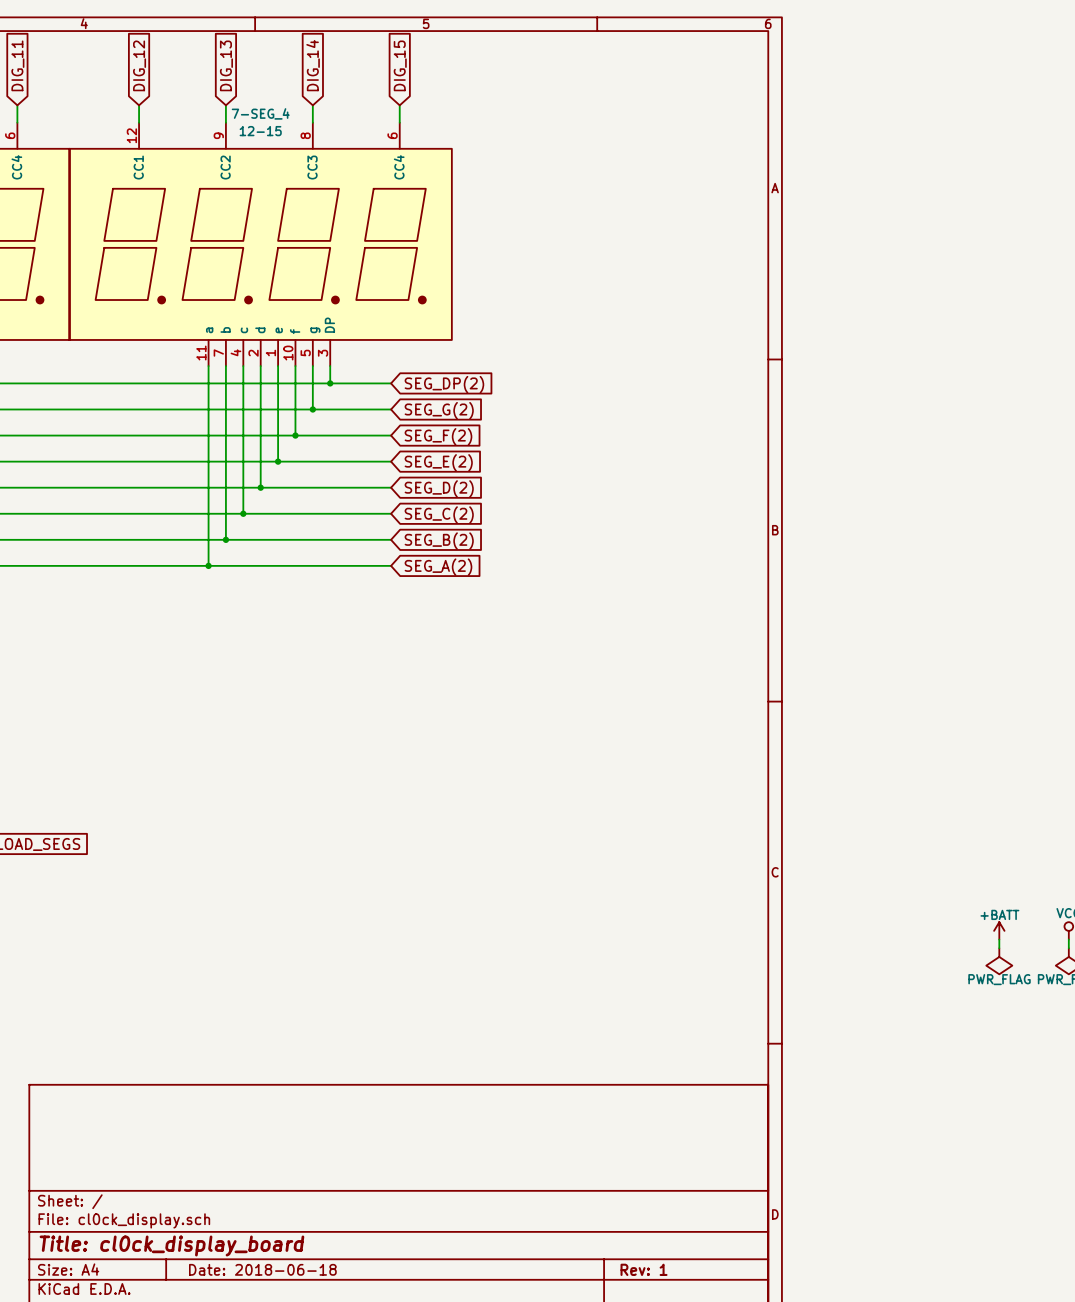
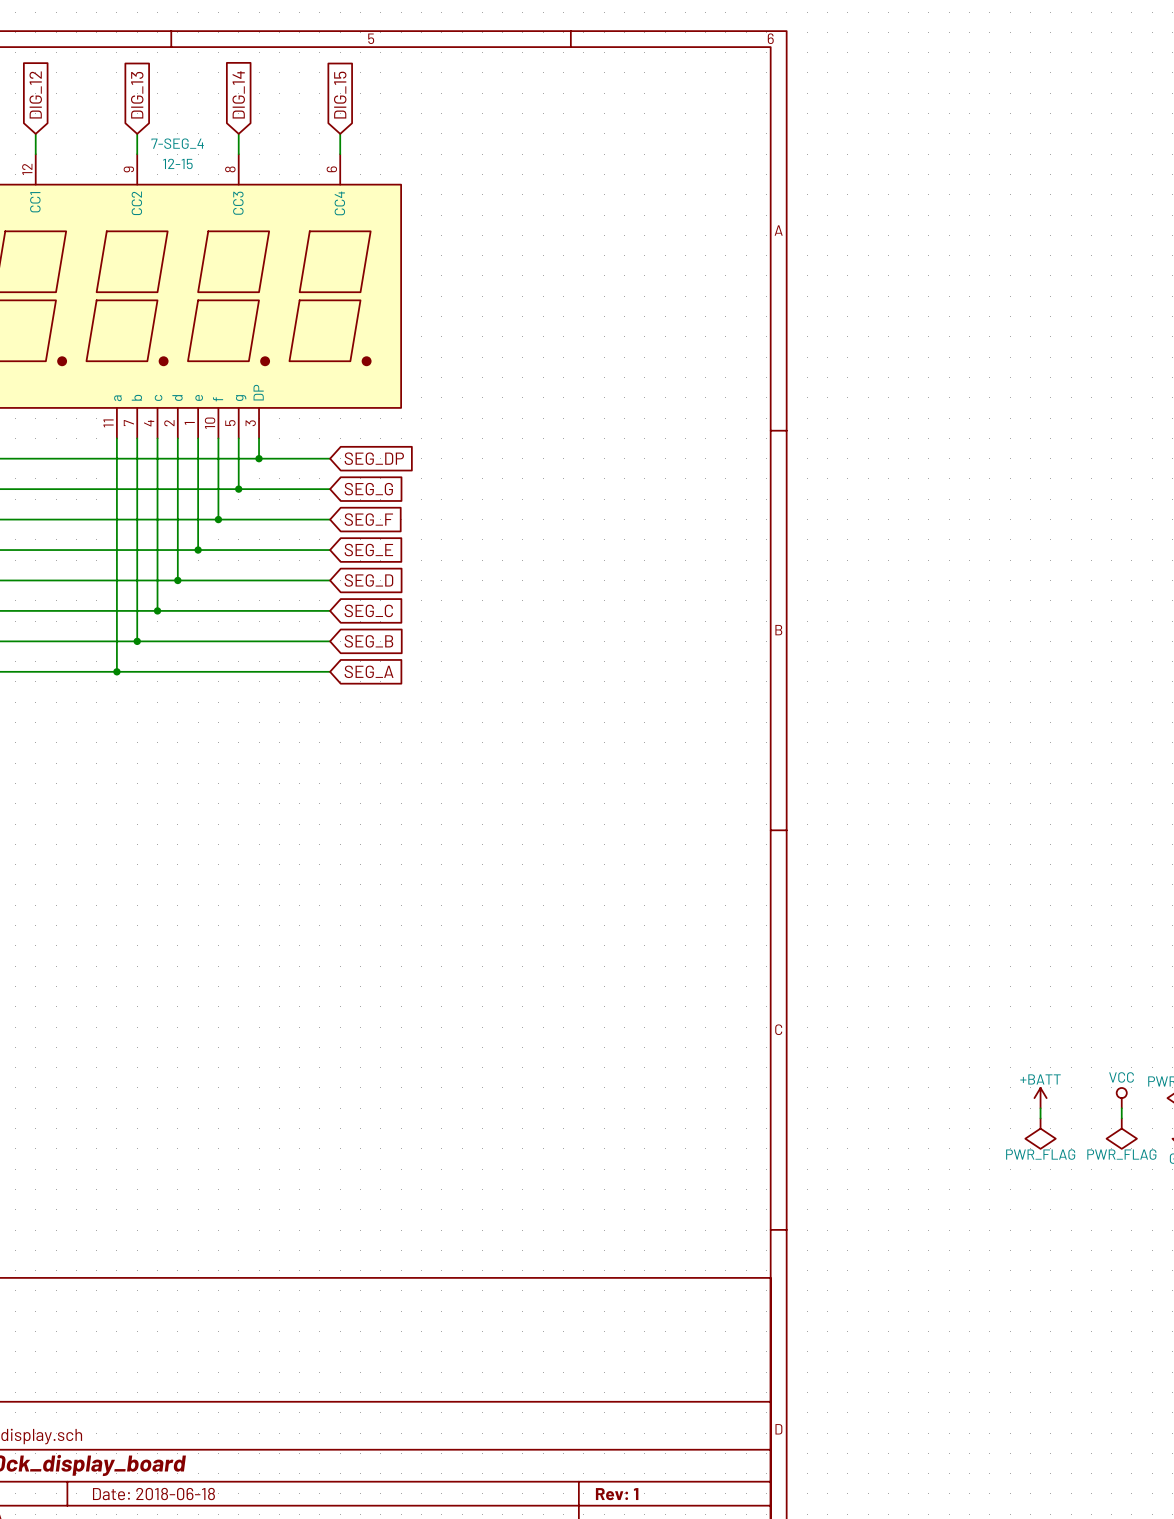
global label: SEG_DP(2) (444, 384) -> SEG_DP (374, 458)
global label: SEG_G(2) (439, 410) -> SEG_G (368, 489)
global label: SEG_F(2) (438, 436) -> SEG_F (368, 519)
global label: SEG_E(2) (438, 462) -> SEG_E (368, 550)
global label: SEG_D(2) (439, 488) -> SEG_D (368, 580)
global label: SEG_C(2) (439, 515) -> SEG_C (368, 610)
global label: SEG_B(2) (439, 541) -> SEG_B (368, 641)
global label: SEG_A(2) (438, 567) -> SEG_A (369, 671)

